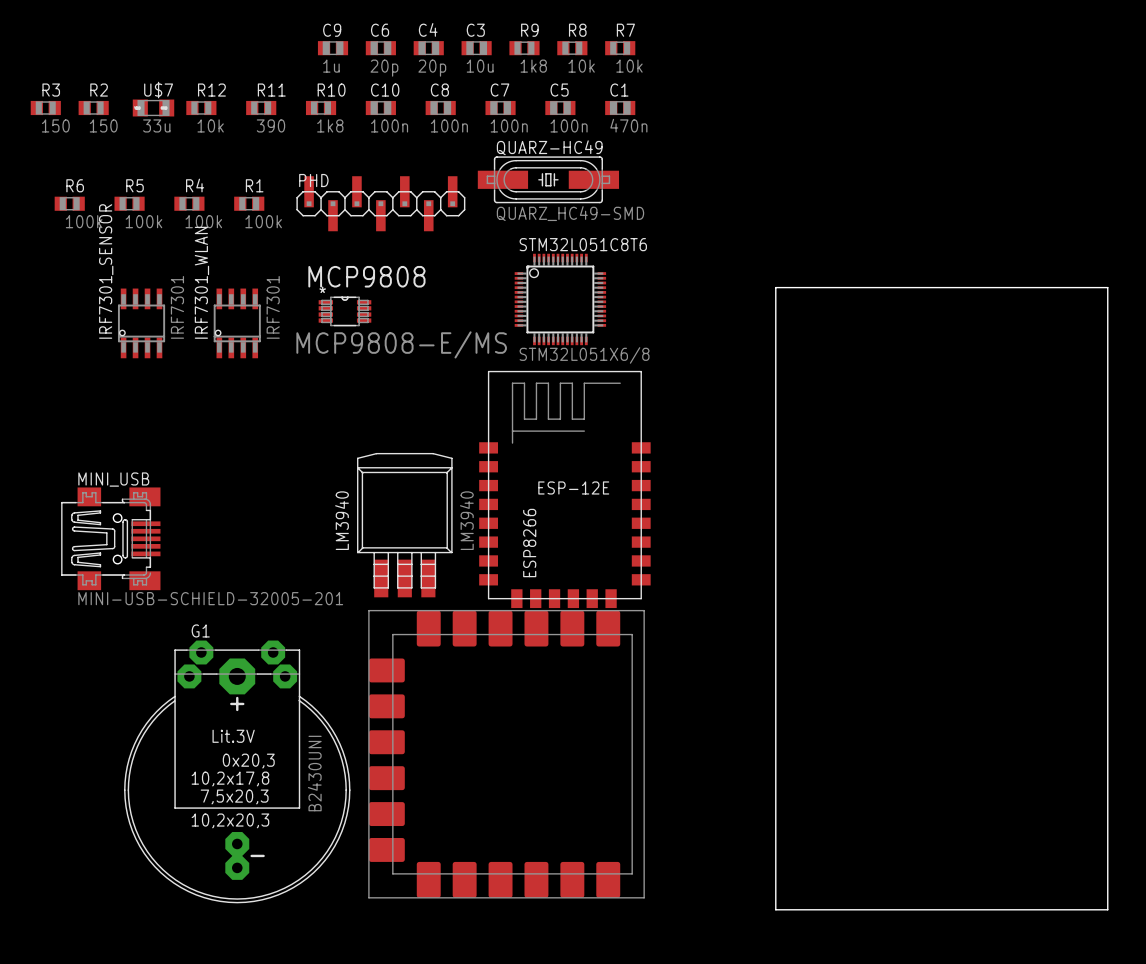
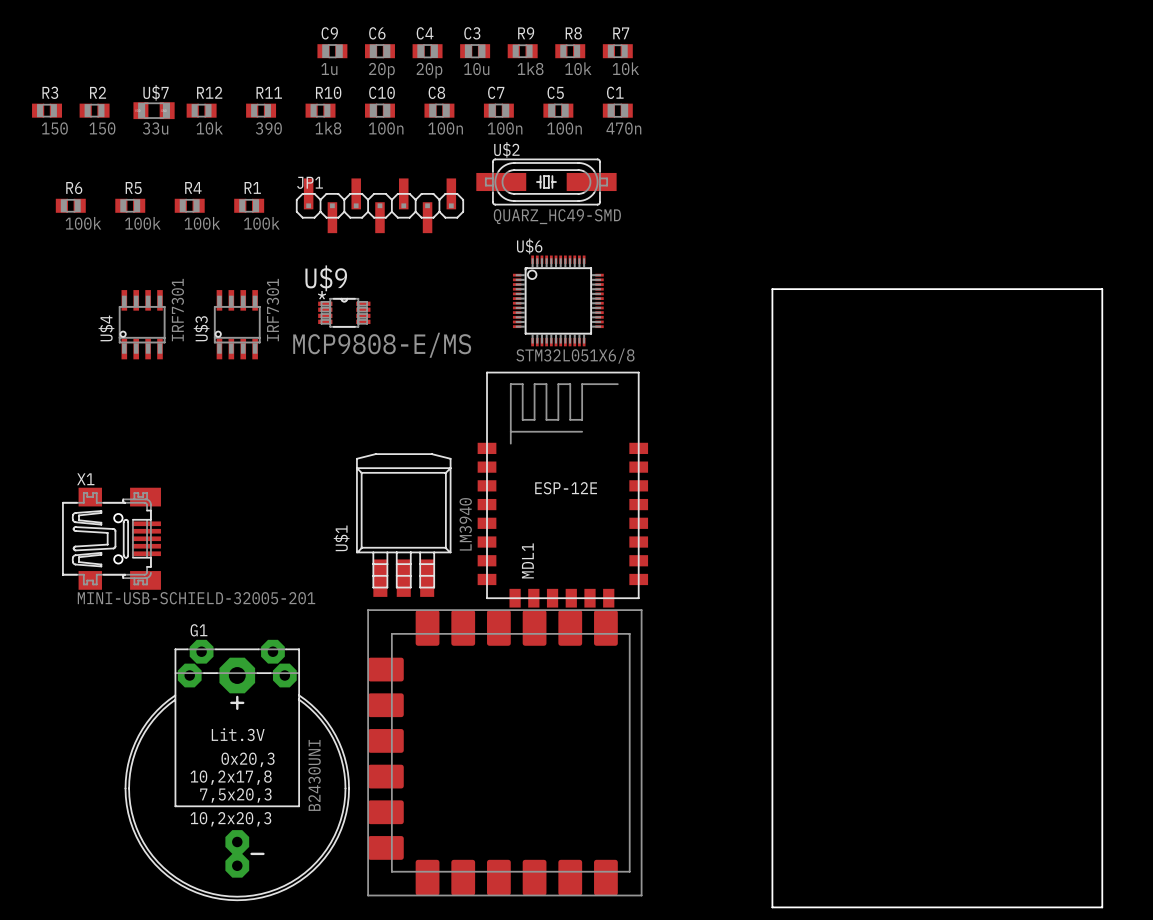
QUARZ-HC49 name: QUARZ-HC49 (549, 147) -> U$2 (506, 149)
PHD name: PHD (313, 180) -> JP1 (310, 182)
STM32L051C8T6 name: STM32L051C8T6 (583, 244) -> U$6 (529, 246)
IRF7301_SENSOR name: IRF7301_SENSOR (106, 271) -> U$4 (106, 328)
MCP9808 name: MCP9808 (366, 276) -> U$9 (326, 278)
IRF7301_WLAN name: IRF7301_WLAN (201, 282) -> U$3 (201, 328)
MINI_USB name: MINI_USB (113, 479) -> X1 (85, 479)
LM3940 name: LM3940 (342, 520) -> U$1 (341, 538)
ESP8266 name: ESP8266 (529, 543) -> MDL1 (527, 560)

